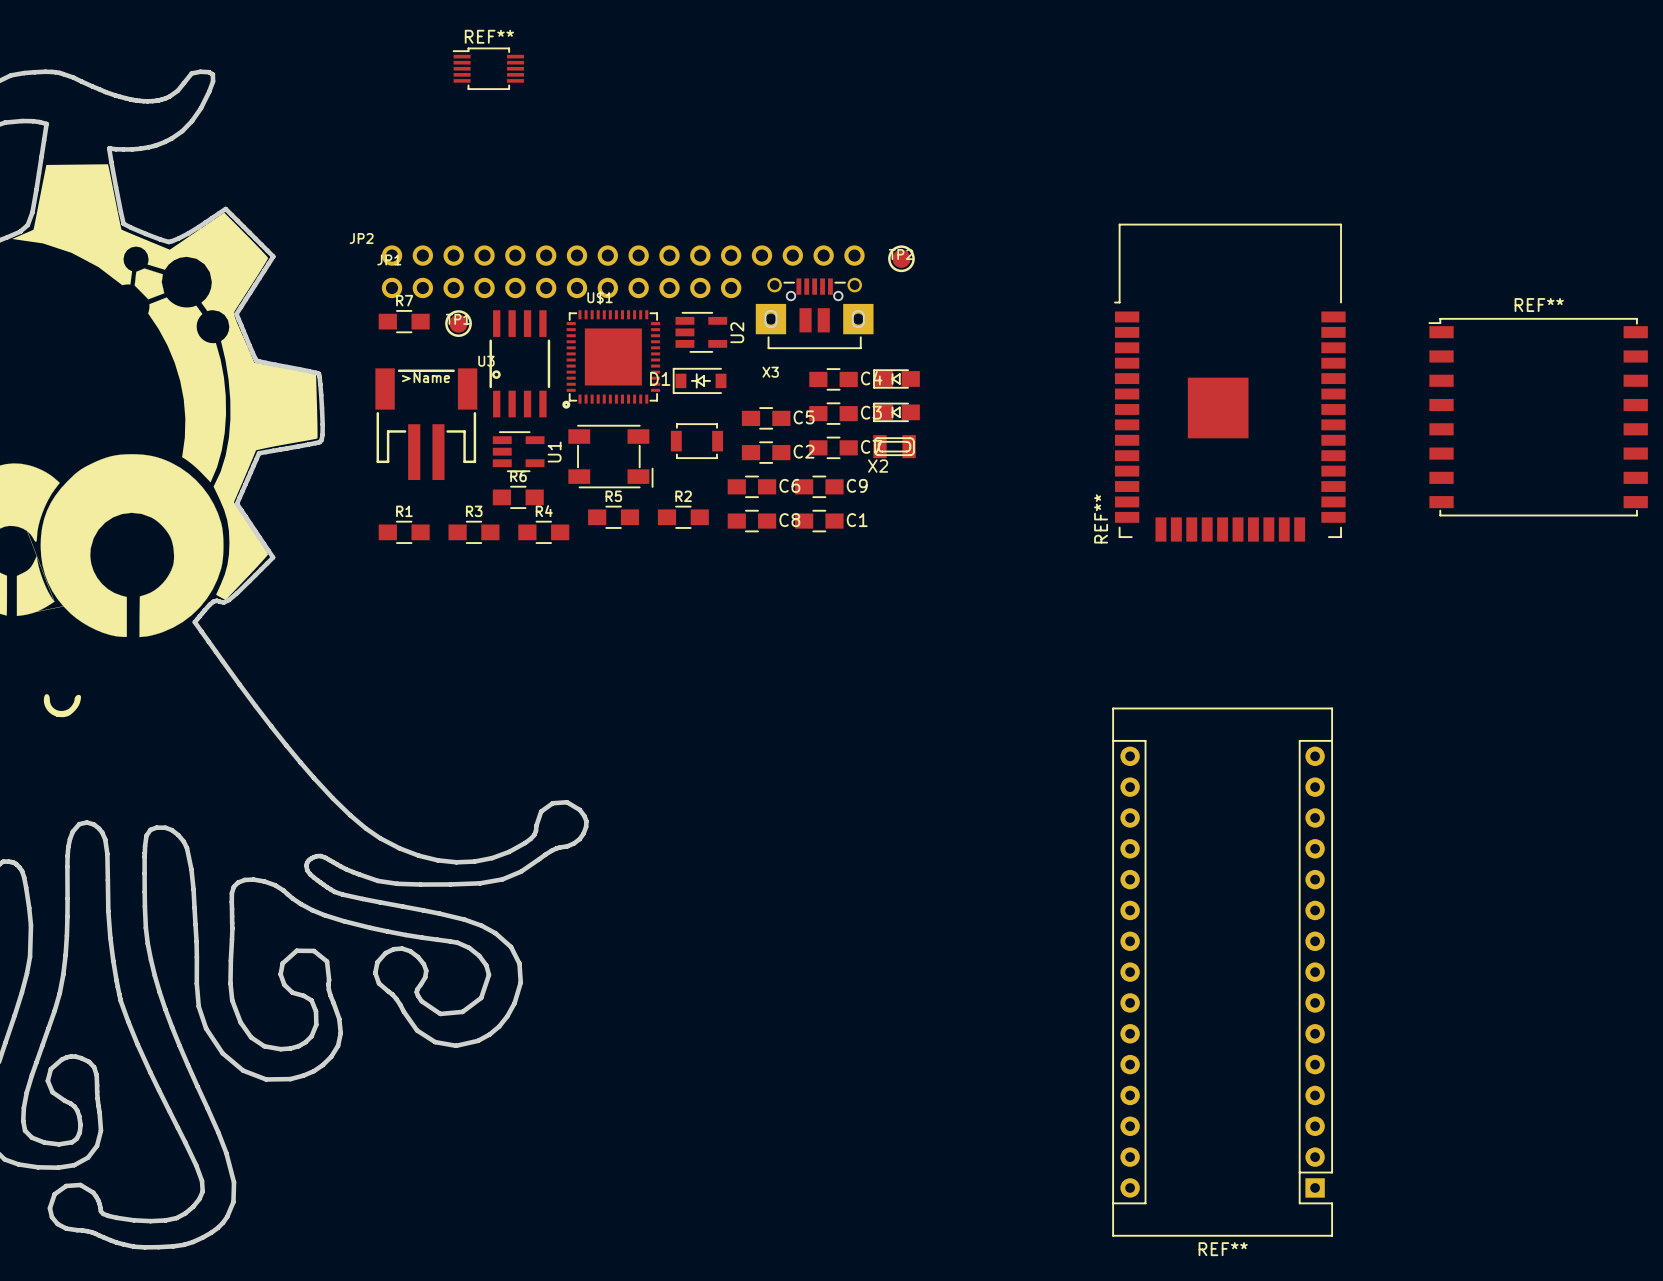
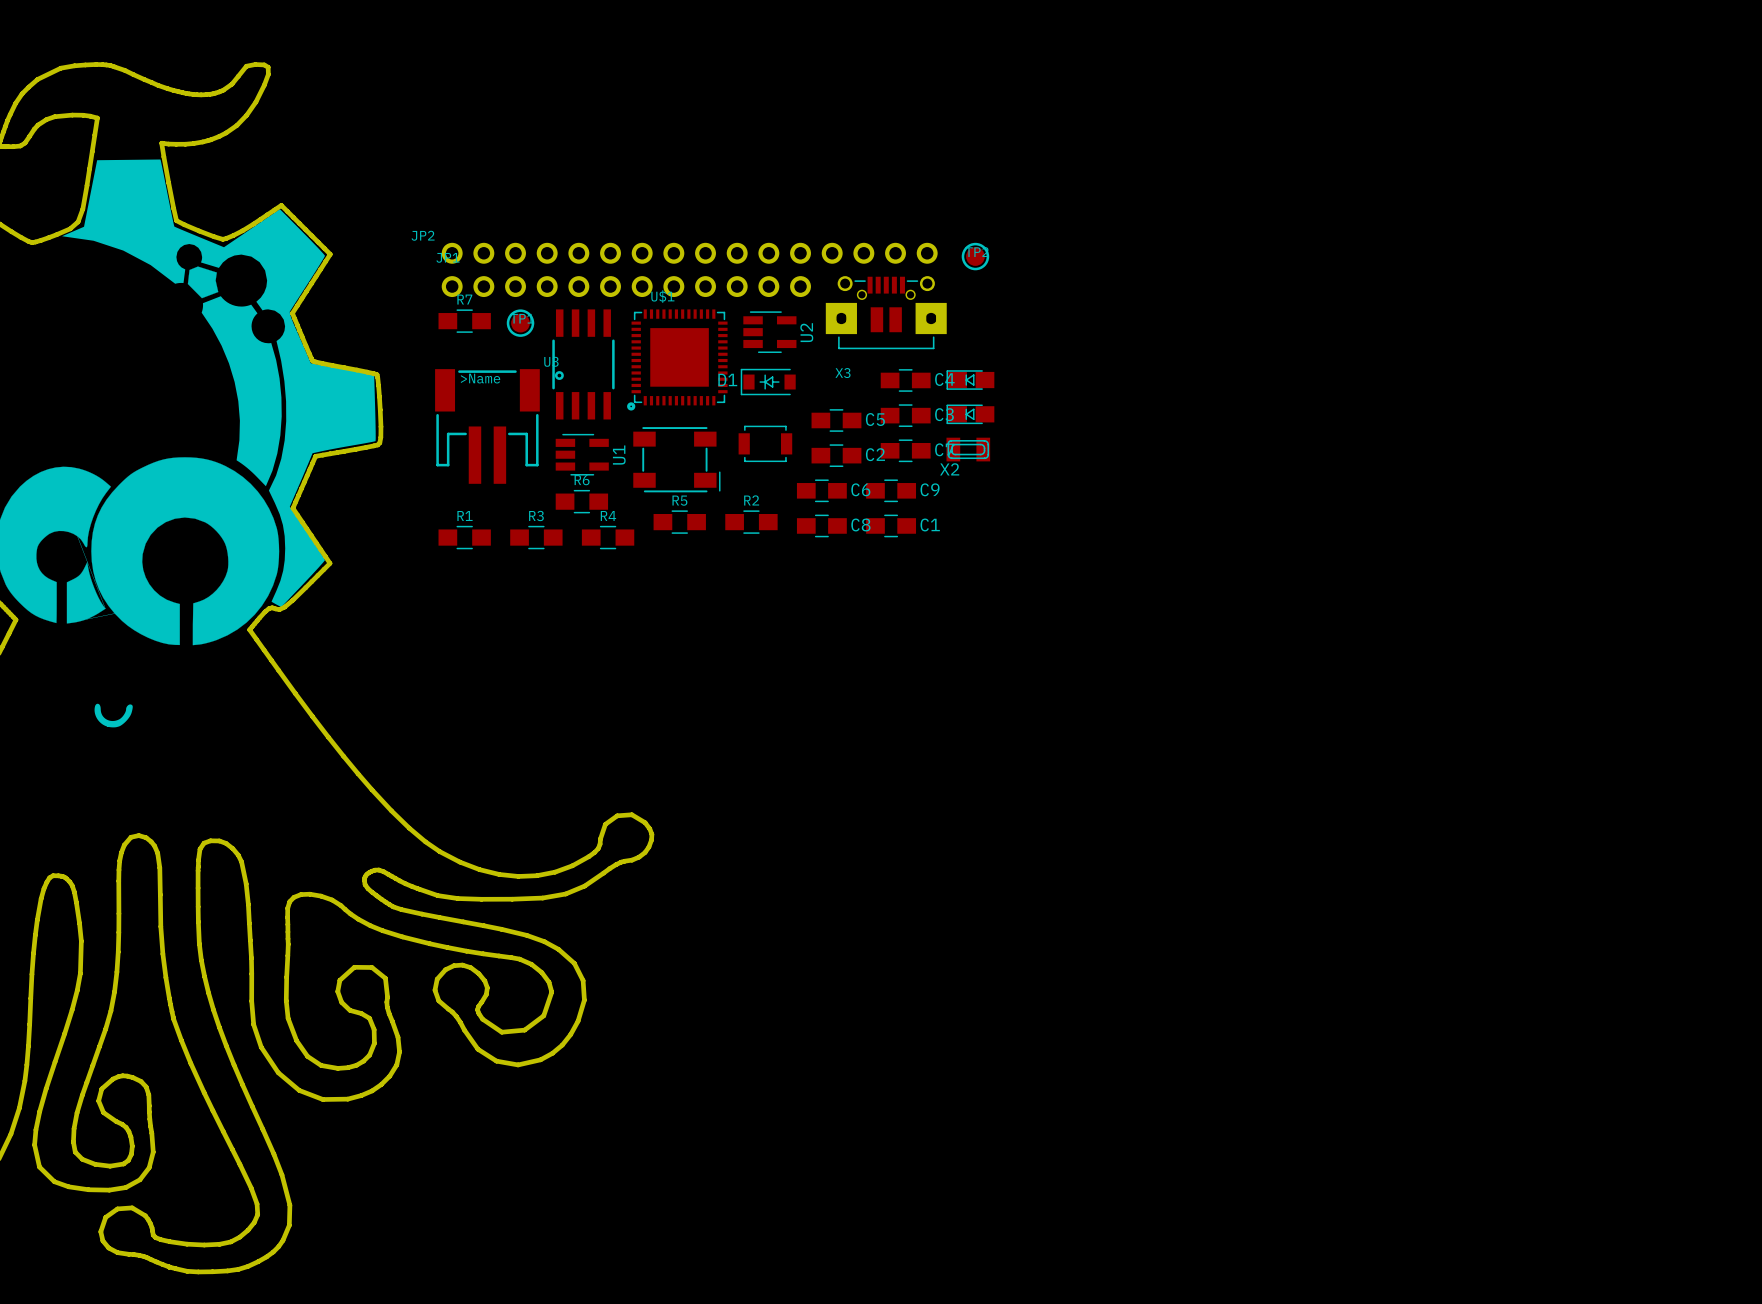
REF**: (488, 68) -> none
REF**: (1229, 382) -> none
REF**: (1538, 417) -> none
REF**: (1222, 972) -> none

